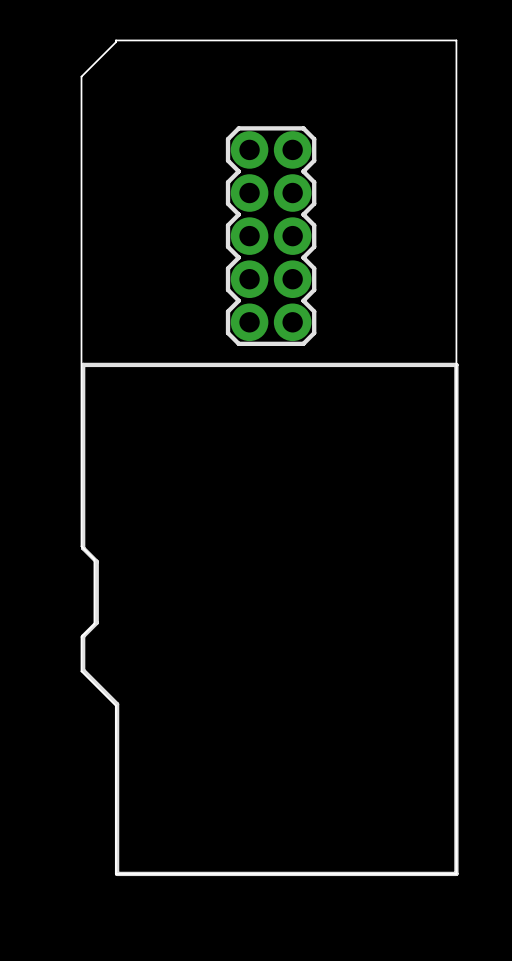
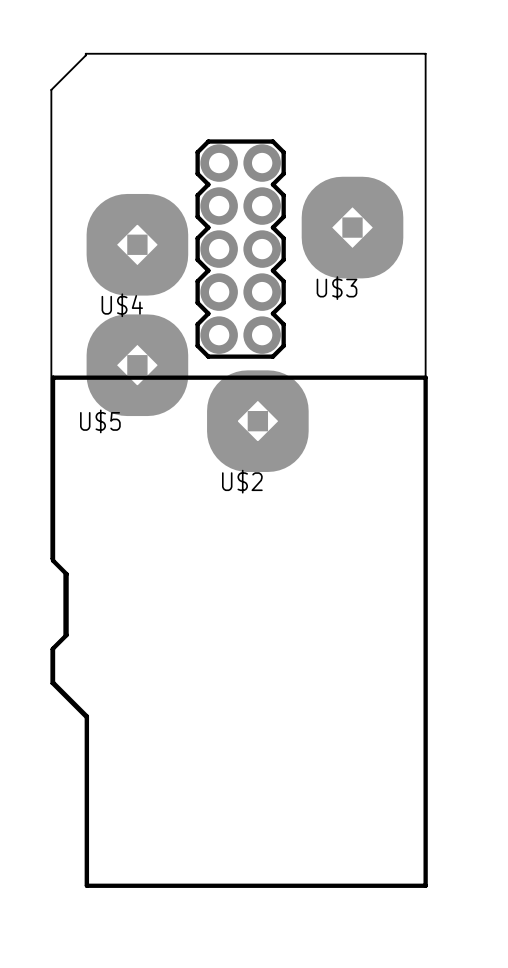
U$3: none -> (352, 227)
U$4: none -> (137, 244)
U$5: none -> (137, 365)
U$2: none -> (257, 421)

